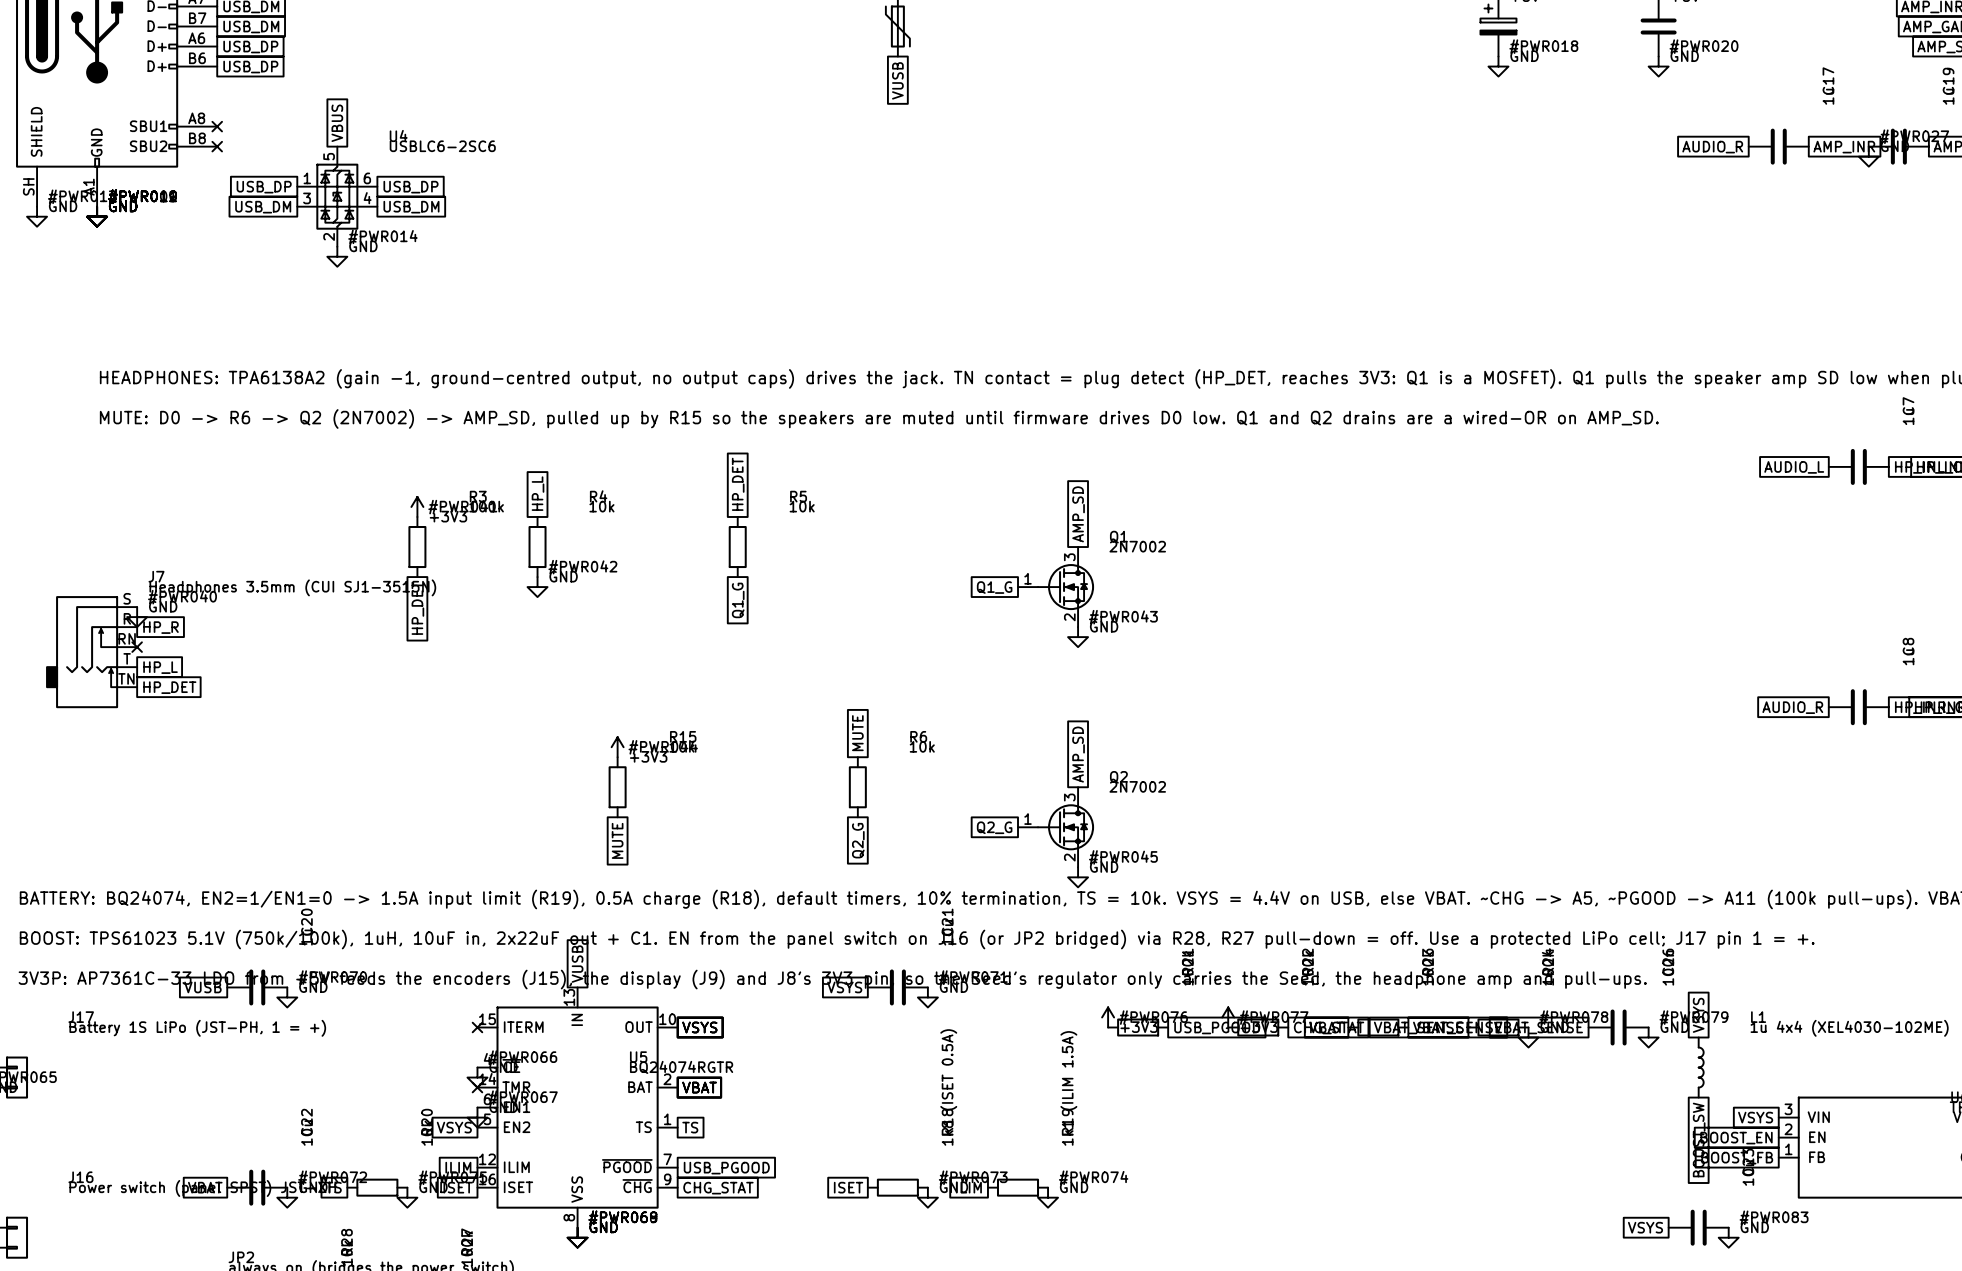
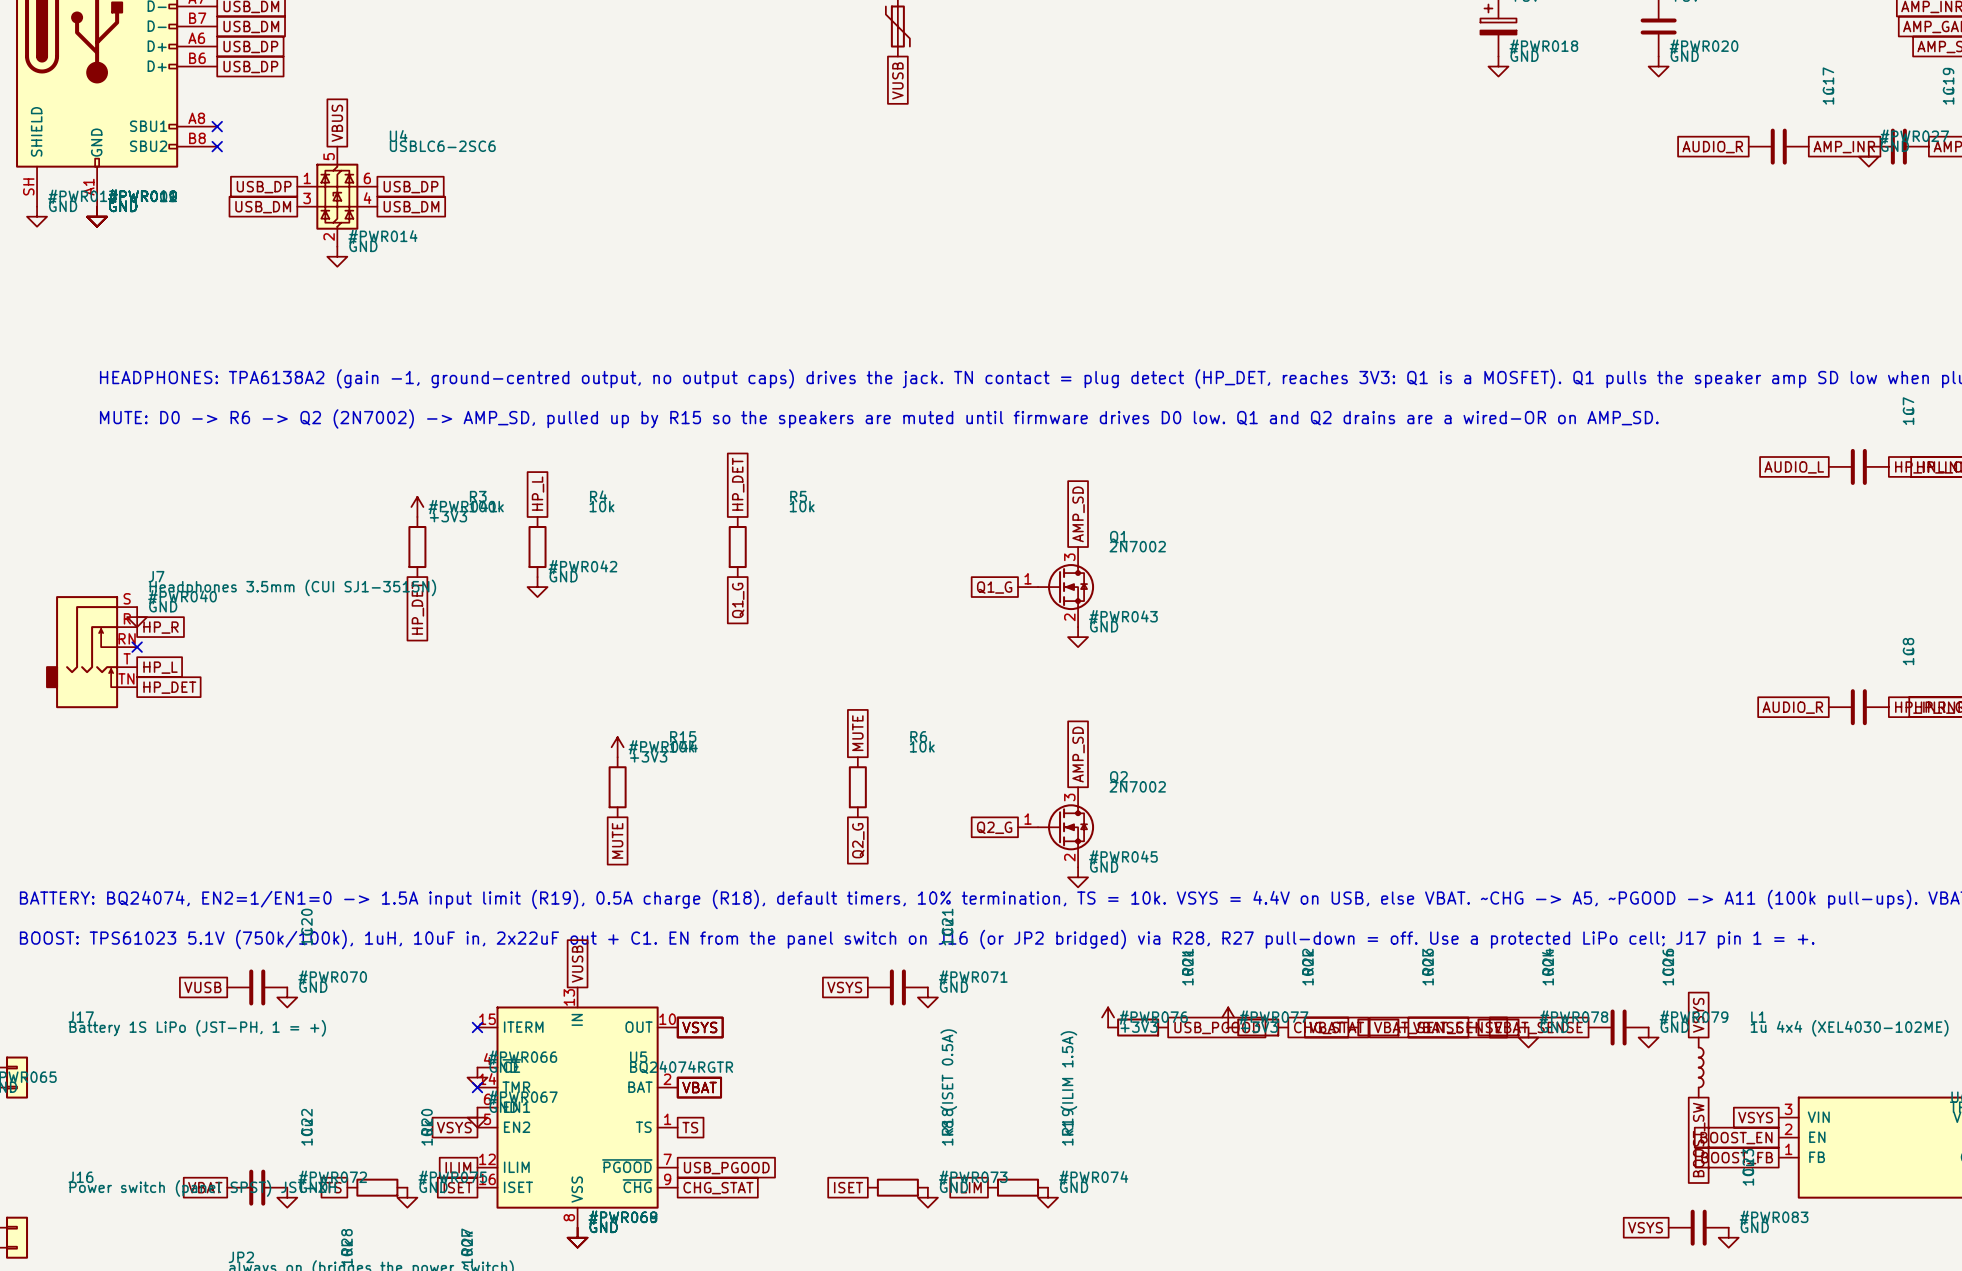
text: 3V3P: AP7361C-33 LDO from +5V feeds the encoders (J15), the display (J9) and J8's 3V3 pin, so the Seed's regulator only carries the Seed, the headphone amp and pull-ups. (832, 979) -> none

